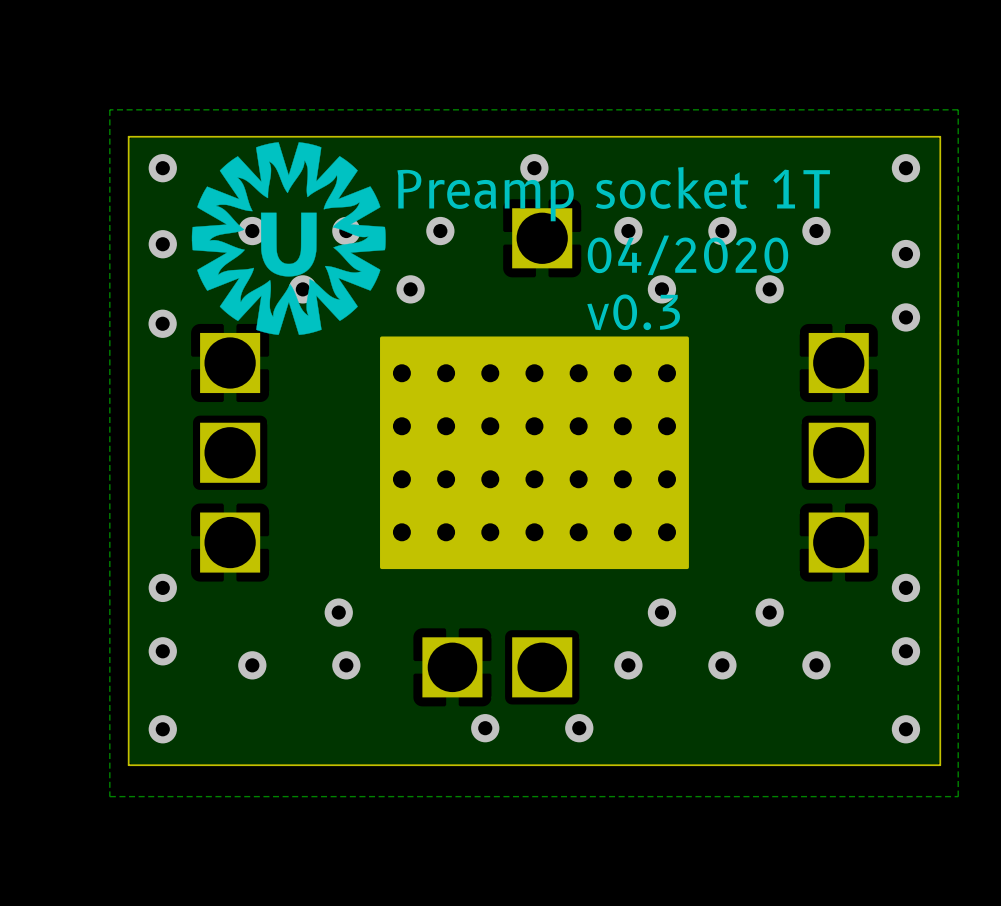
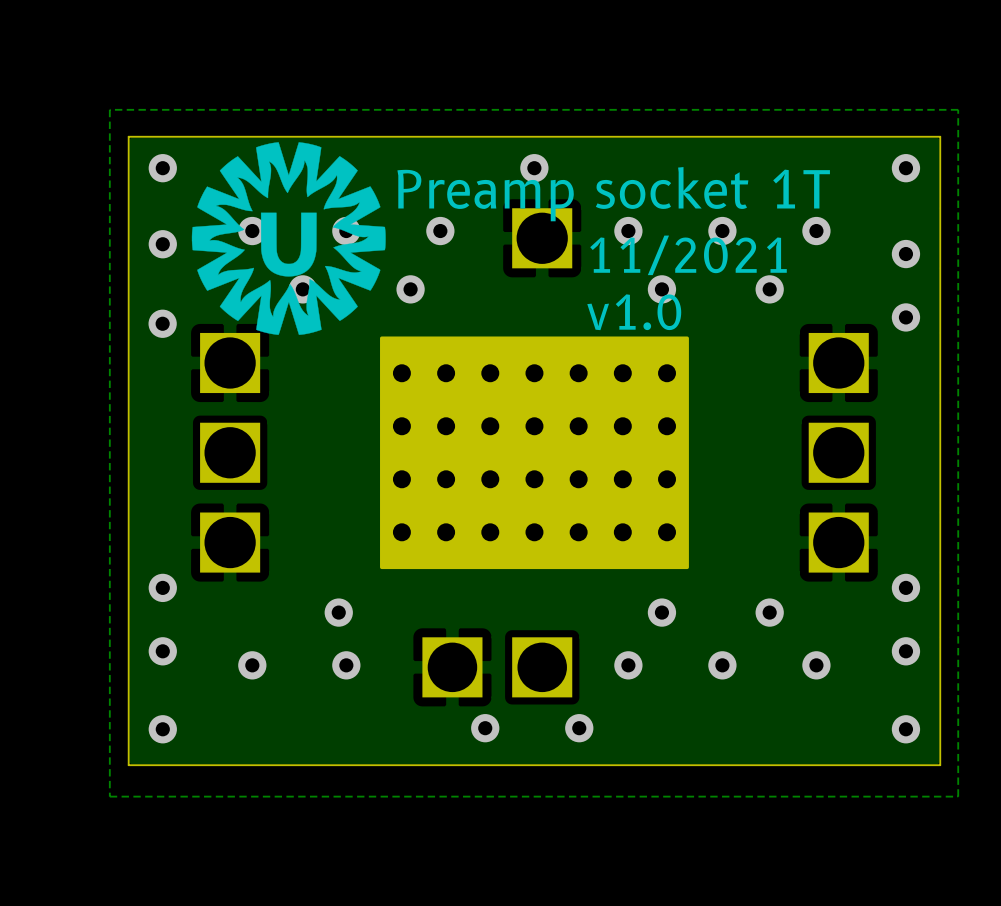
text: 04/2020 (687, 255) -> 11/2021 (688, 255)
text: v0.3 (633, 312) -> v1.0 (634, 312)

